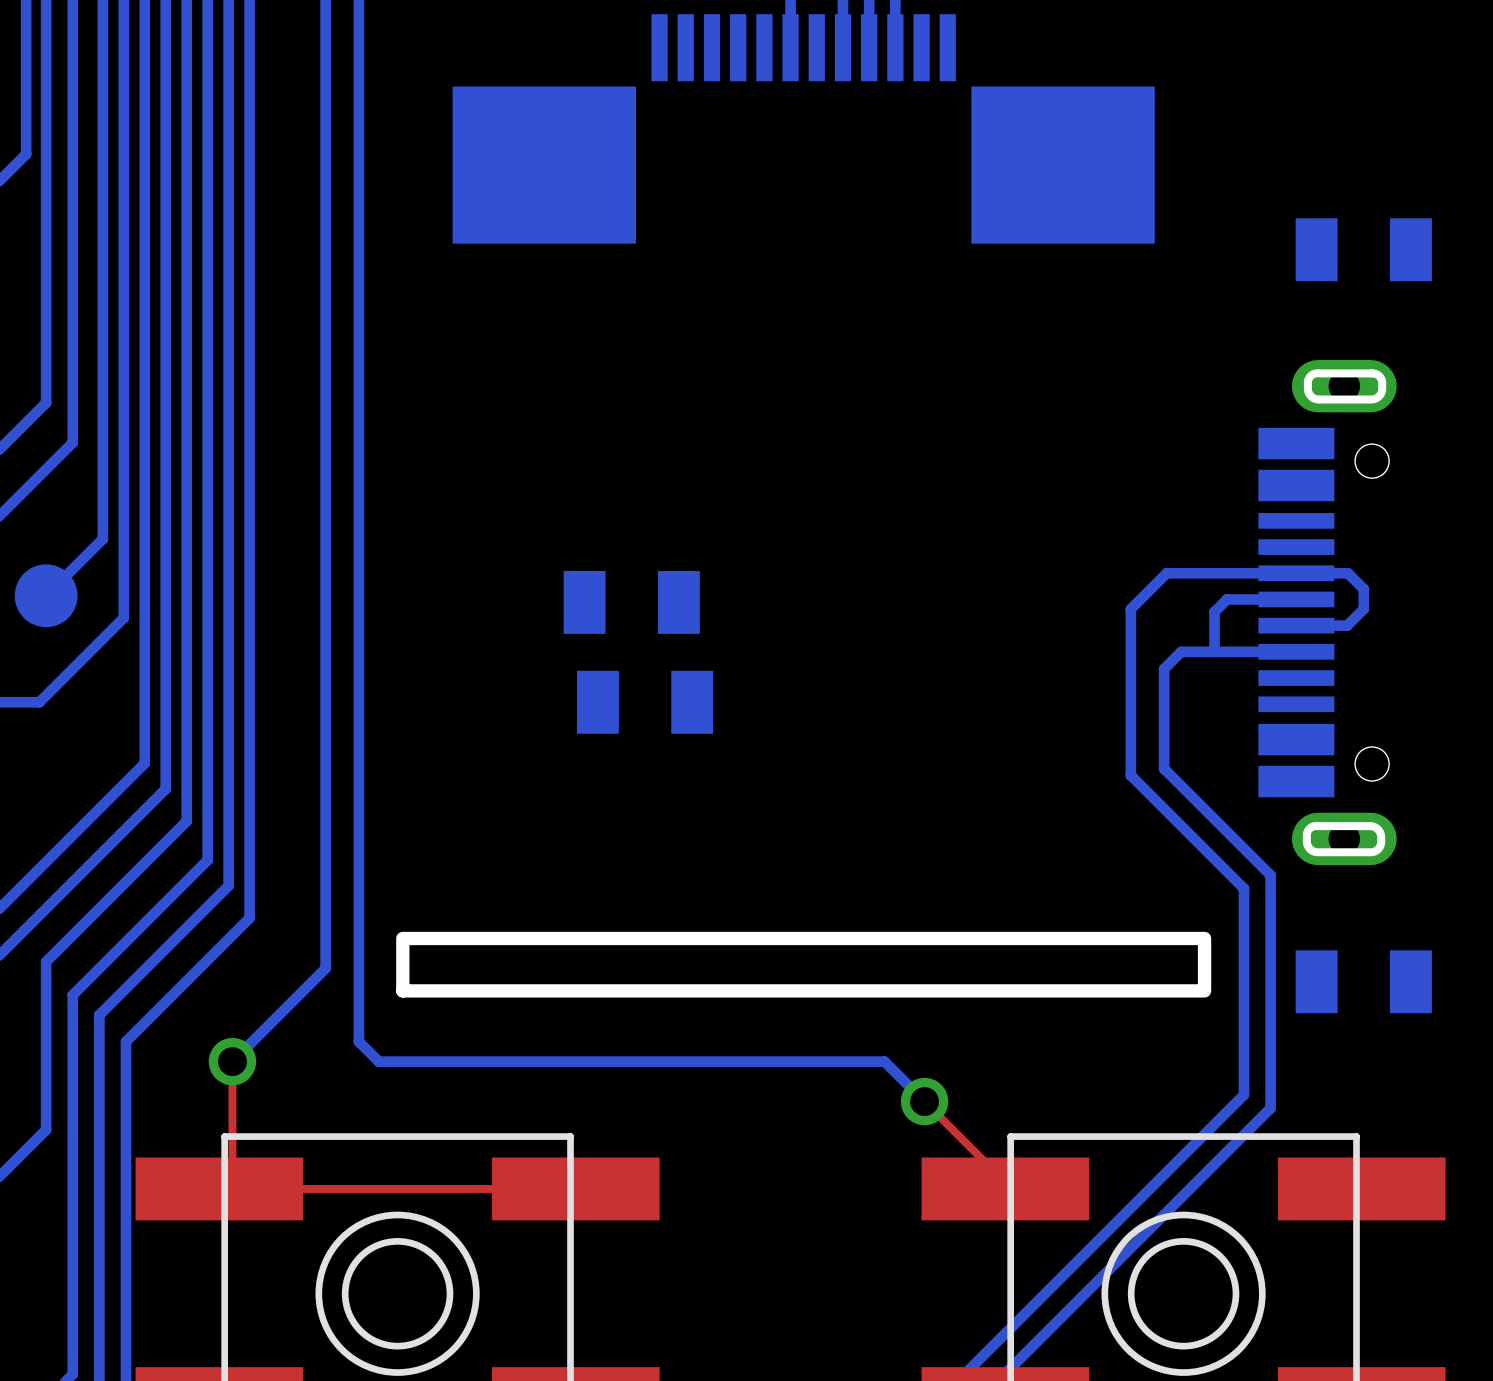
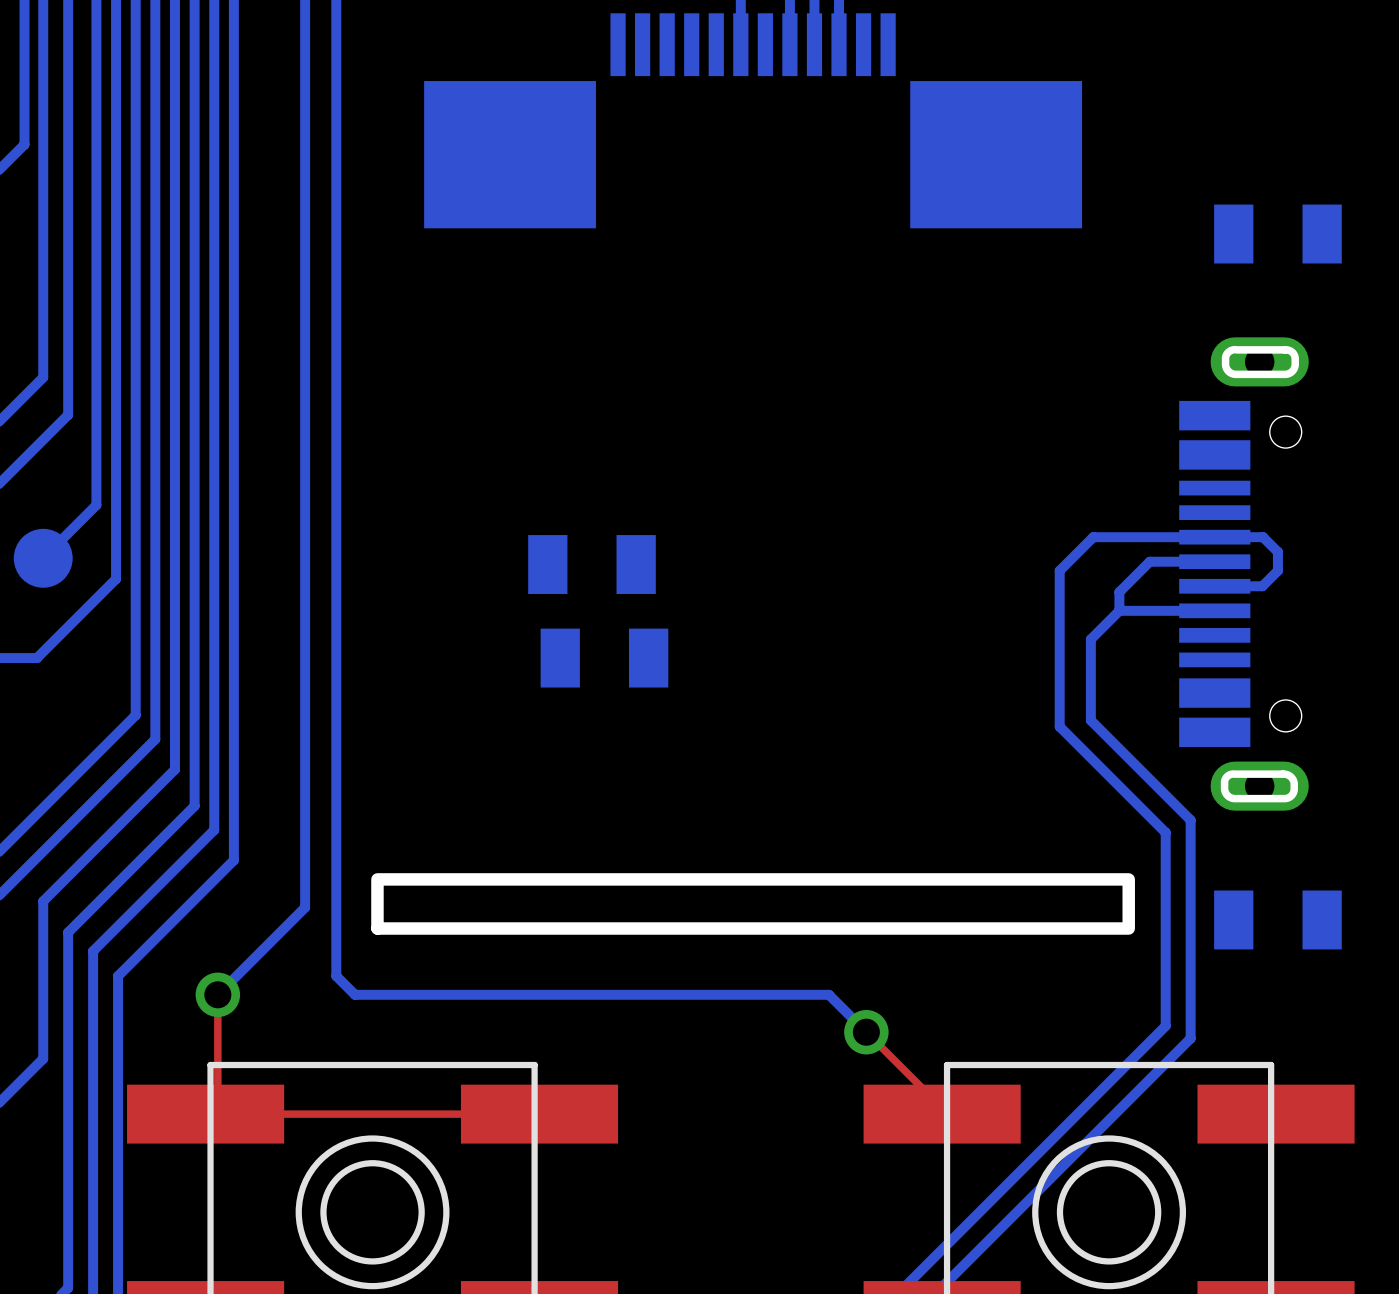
bottom track: (1214, 611) (1214, 651) -> none
bottom track: (1194, 651) (1181, 651) (1164, 669) (1164, 682) -> (1138, 573) (1119, 592) (1119, 610) (1090, 639)

